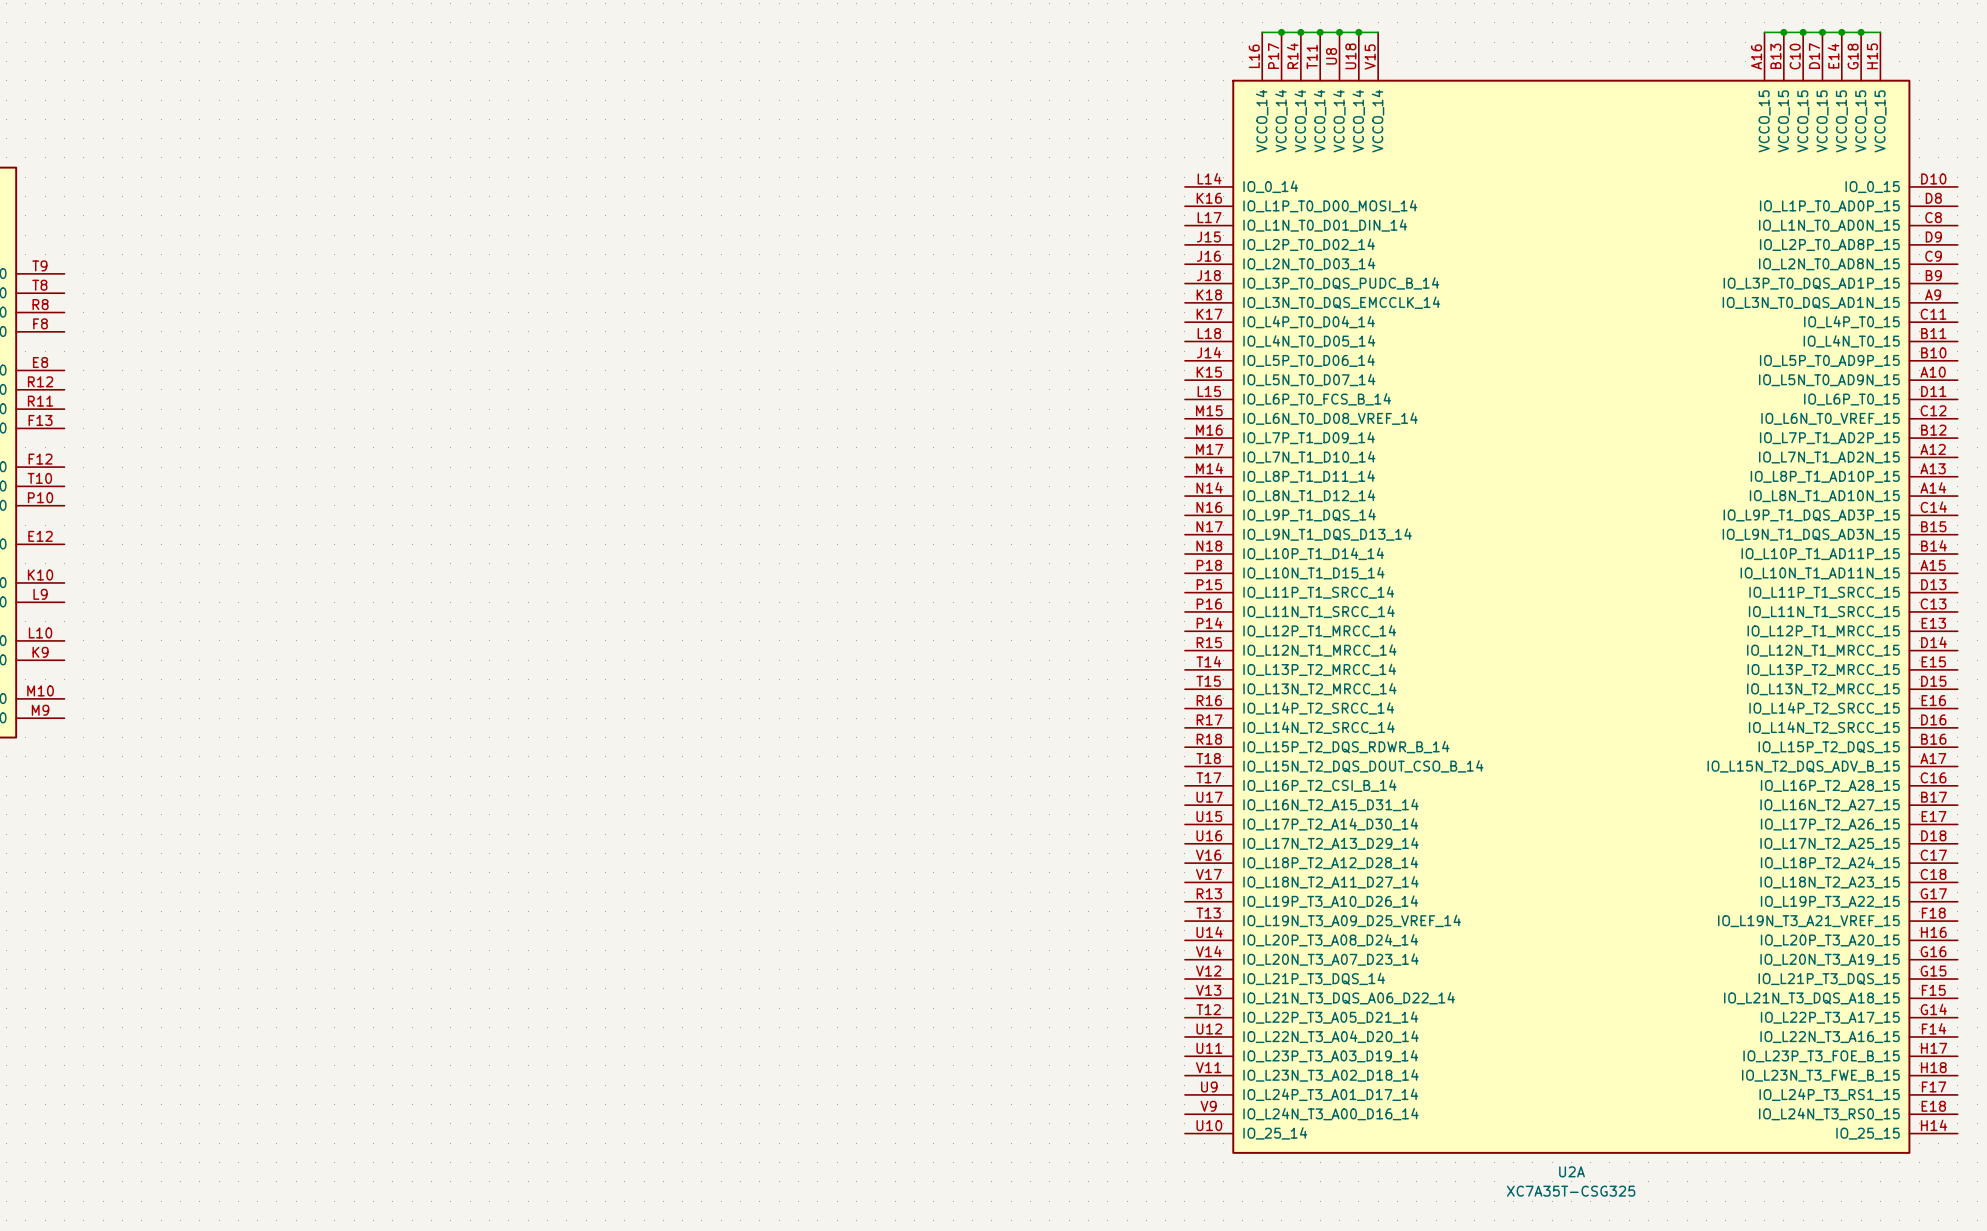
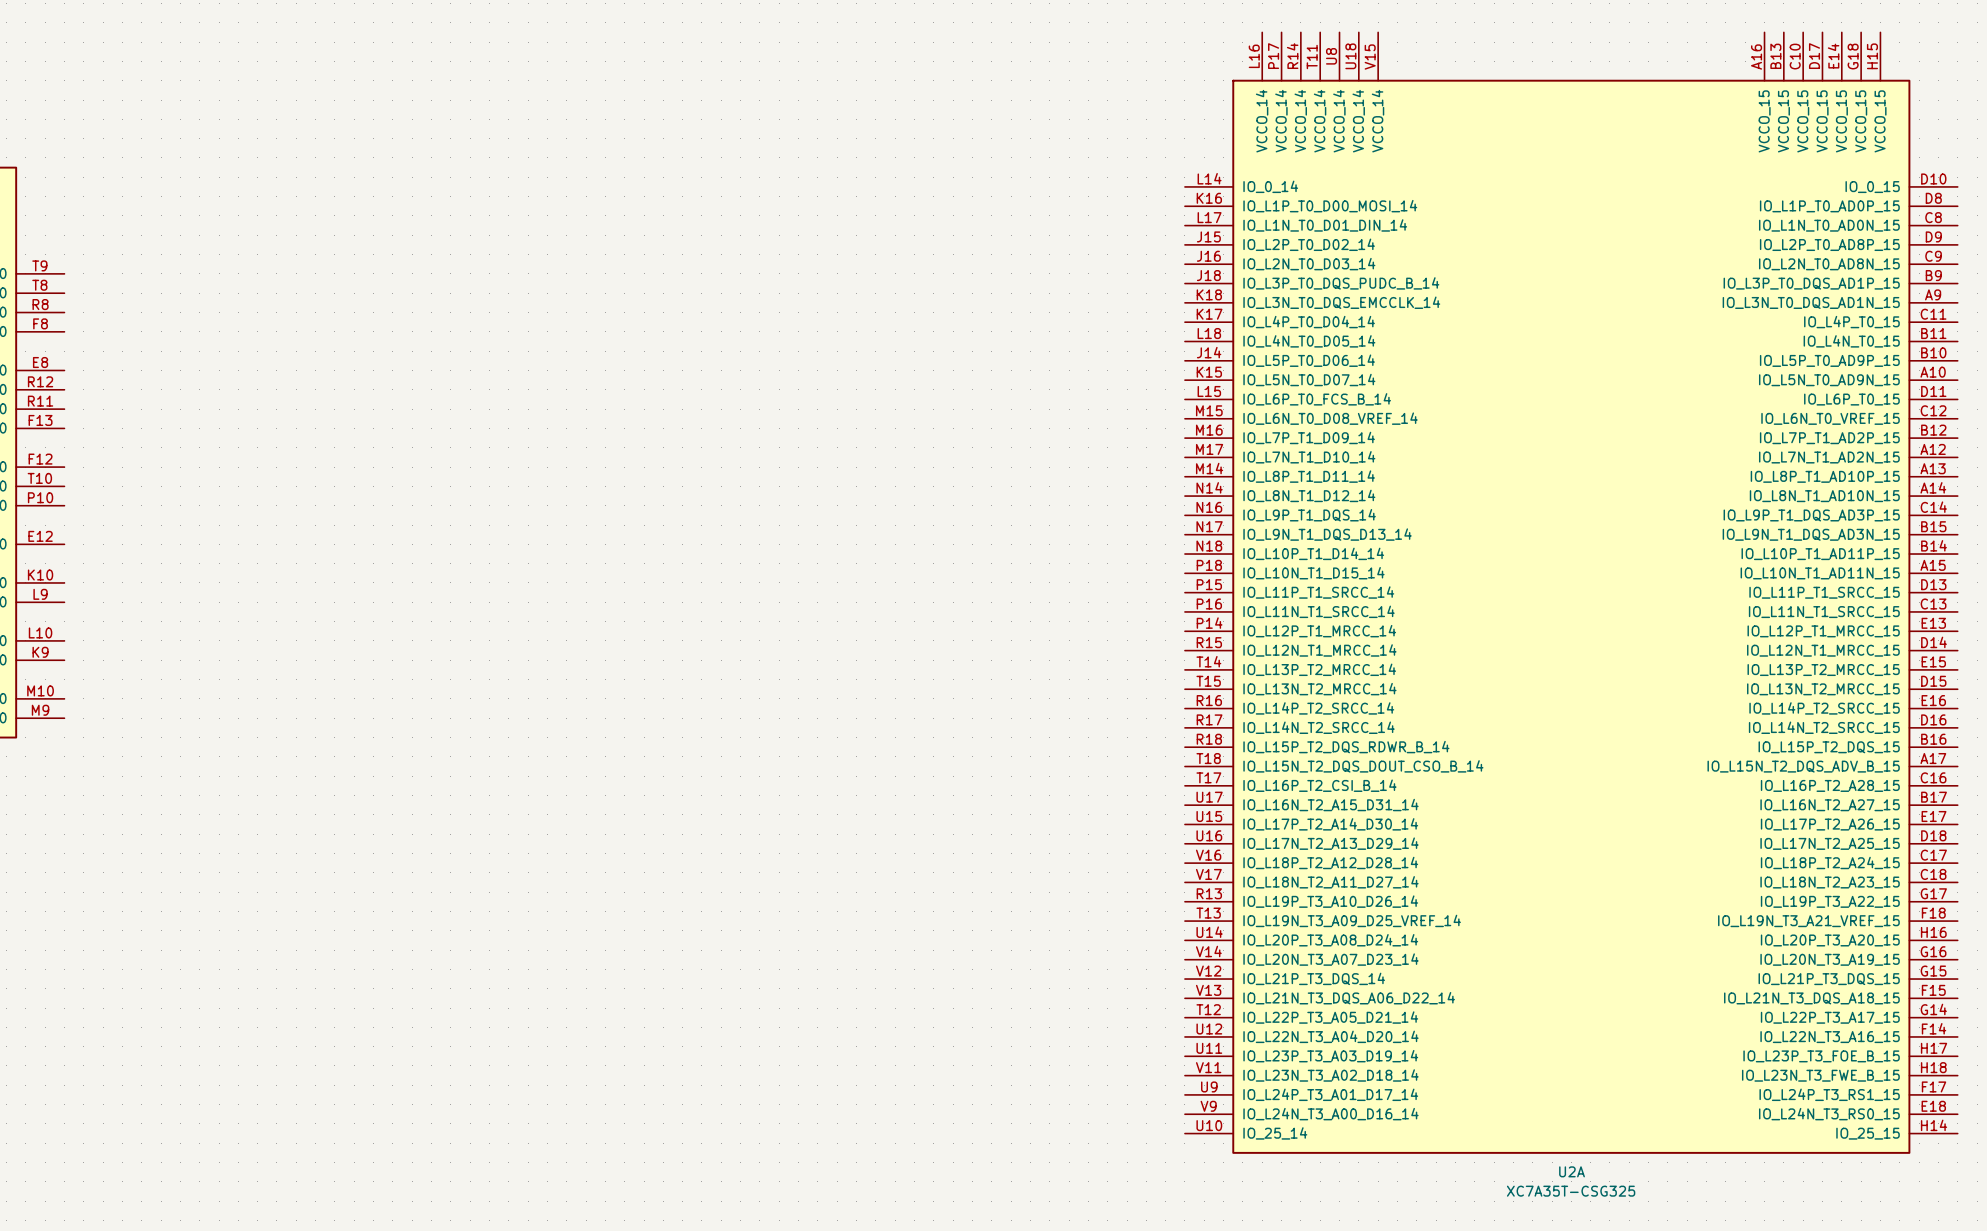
wire: (1262, 32) (1378, 32) -> none
junction: (1281, 32) -> none
junction: (1300, 32) -> none
junction: (1320, 32) -> none
junction: (1339, 32) -> none
junction: (1358, 32) -> none
wire: (1764, 32) (1880, 32) -> none
junction: (1783, 32) -> none
junction: (1803, 32) -> none
junction: (1822, 32) -> none
junction: (1841, 32) -> none
junction: (1861, 32) -> none

